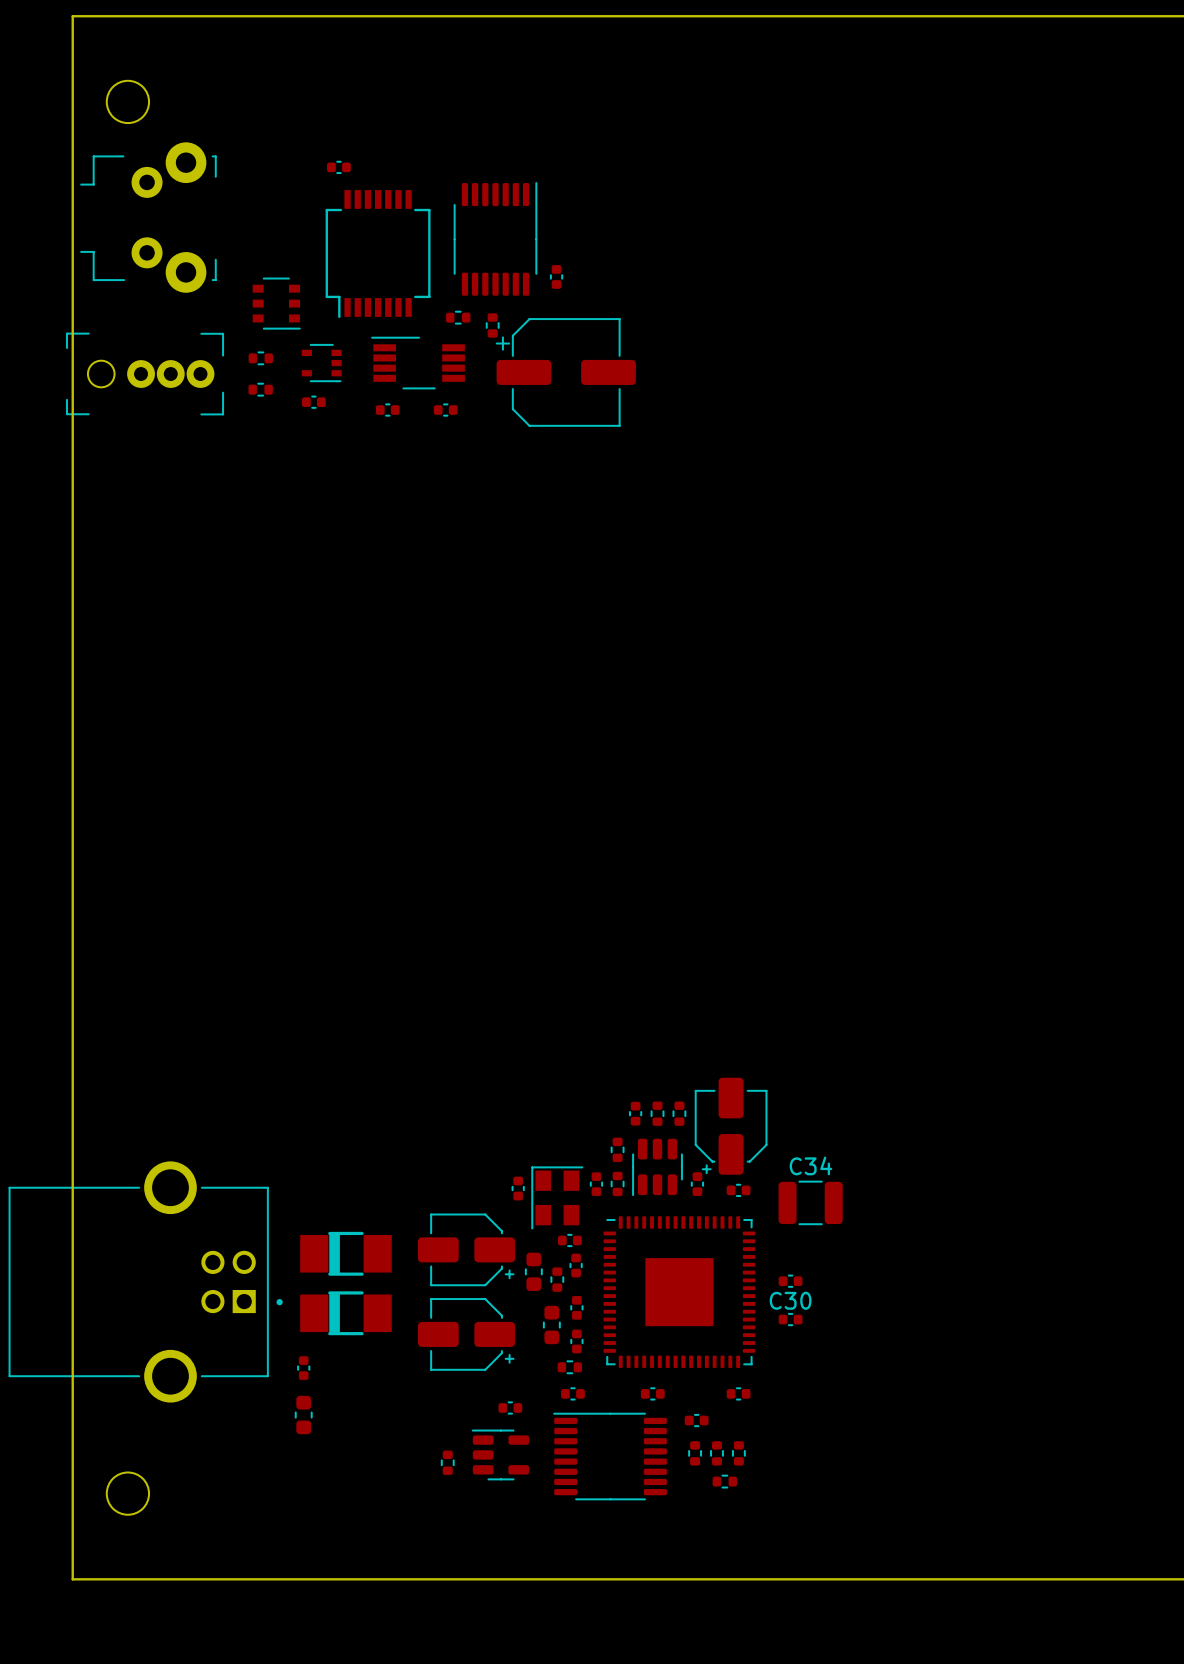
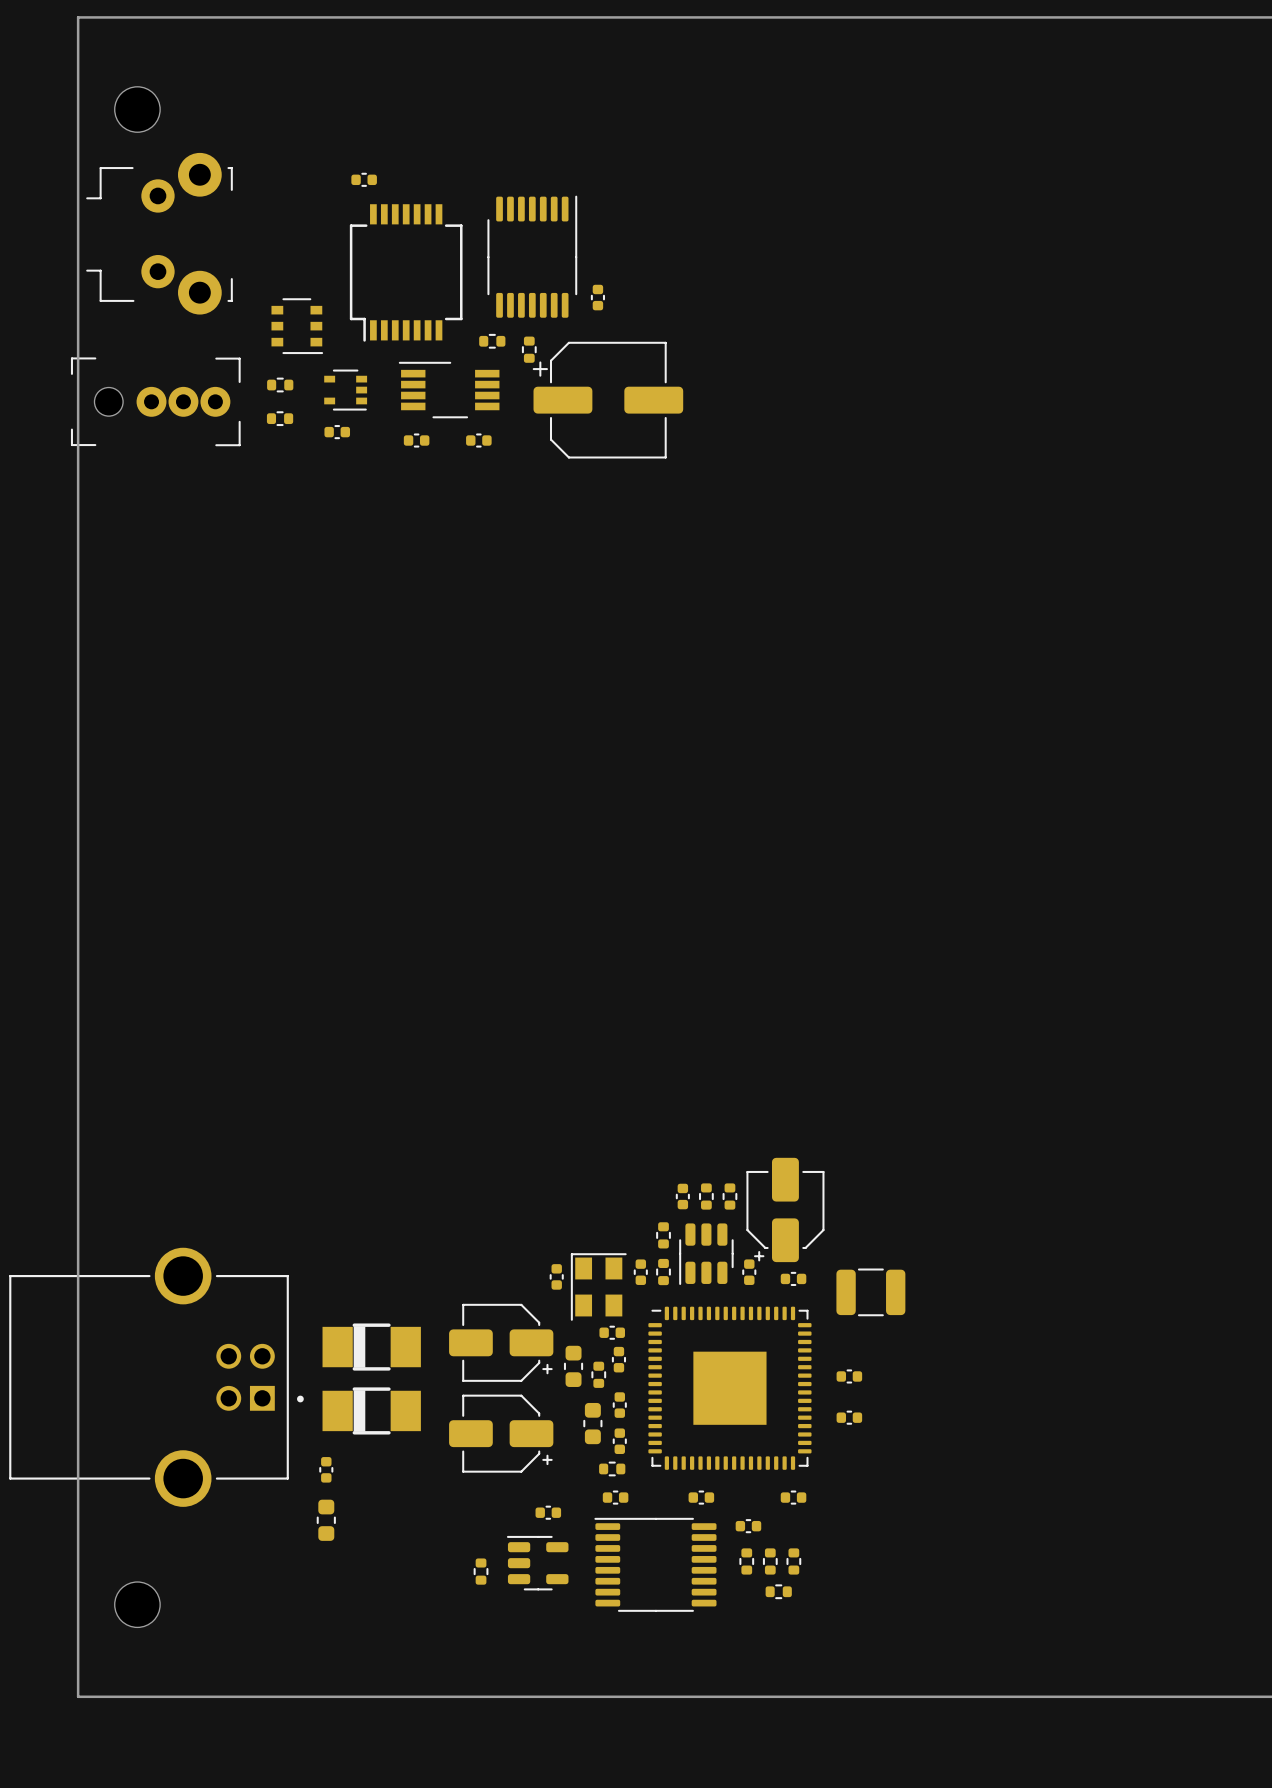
C34 name: C34 (810, 1165) -> none
C30 name: C30 (790, 1300) -> none

